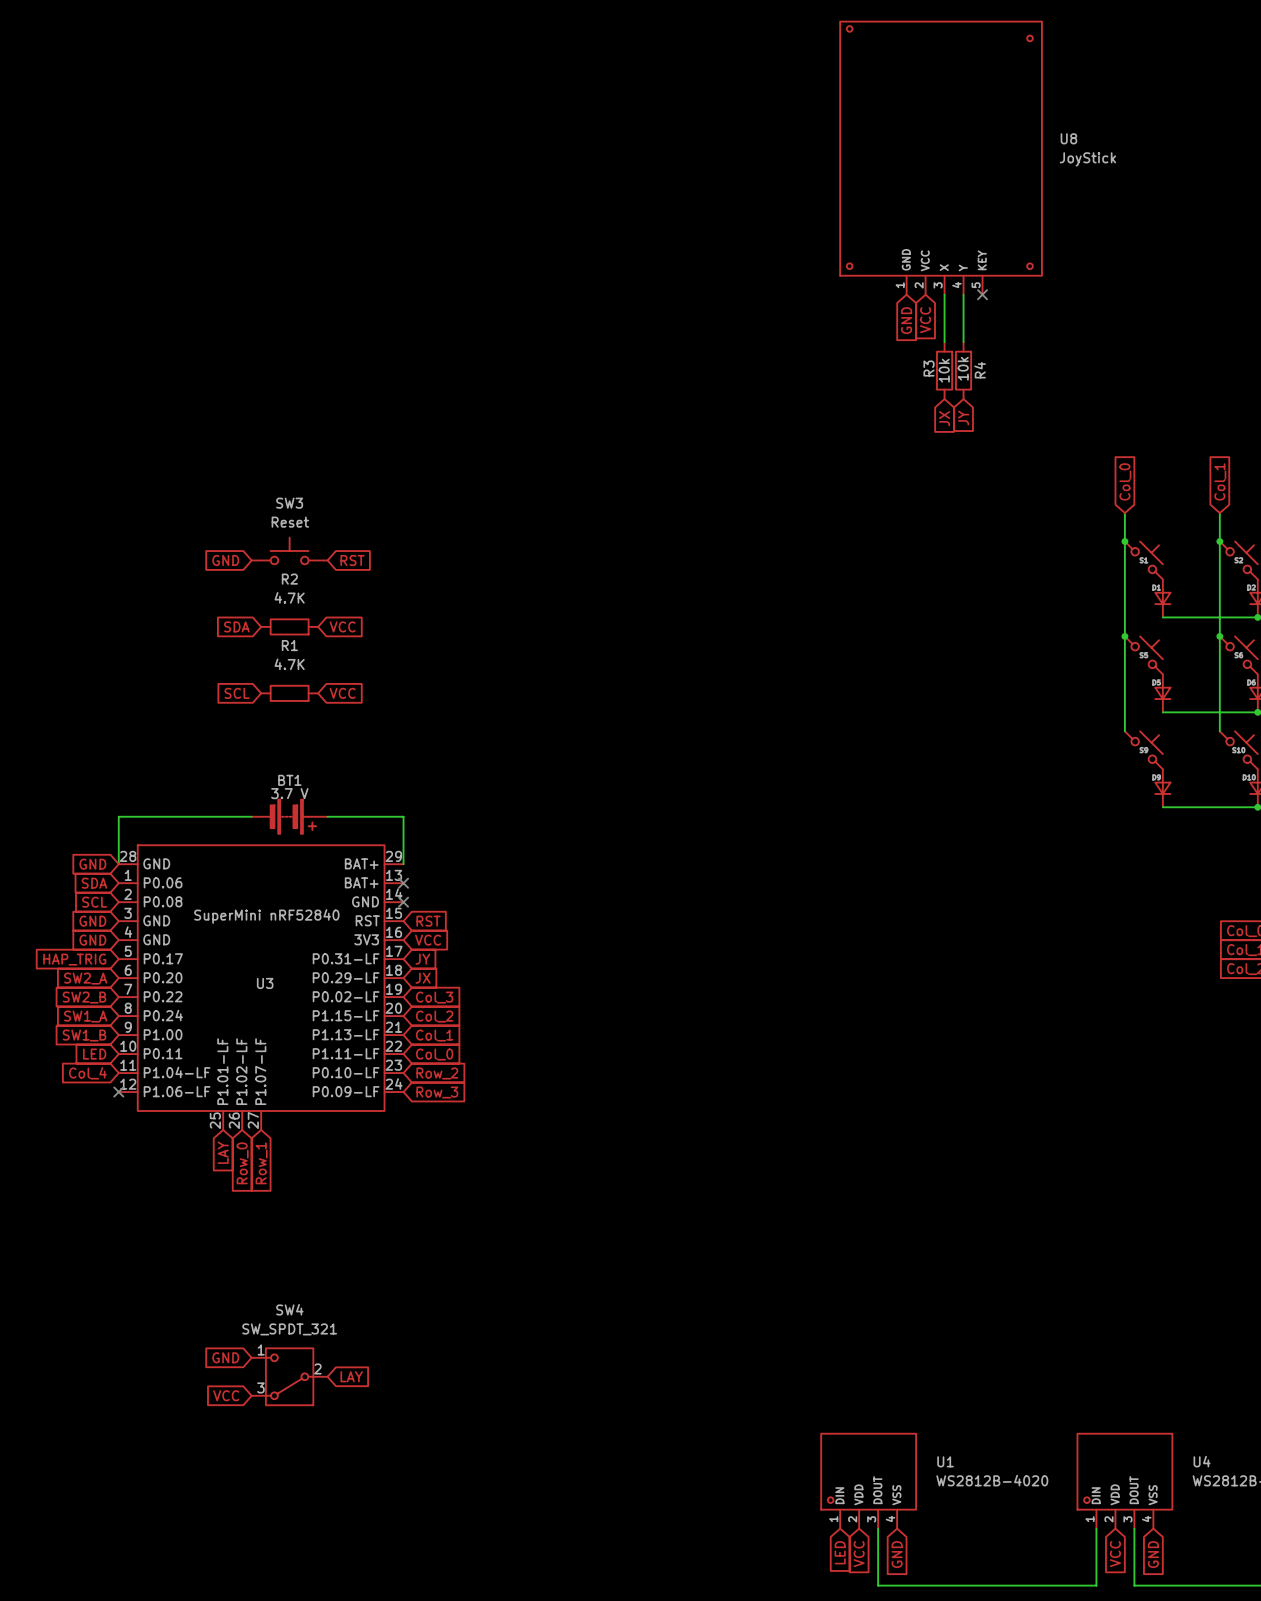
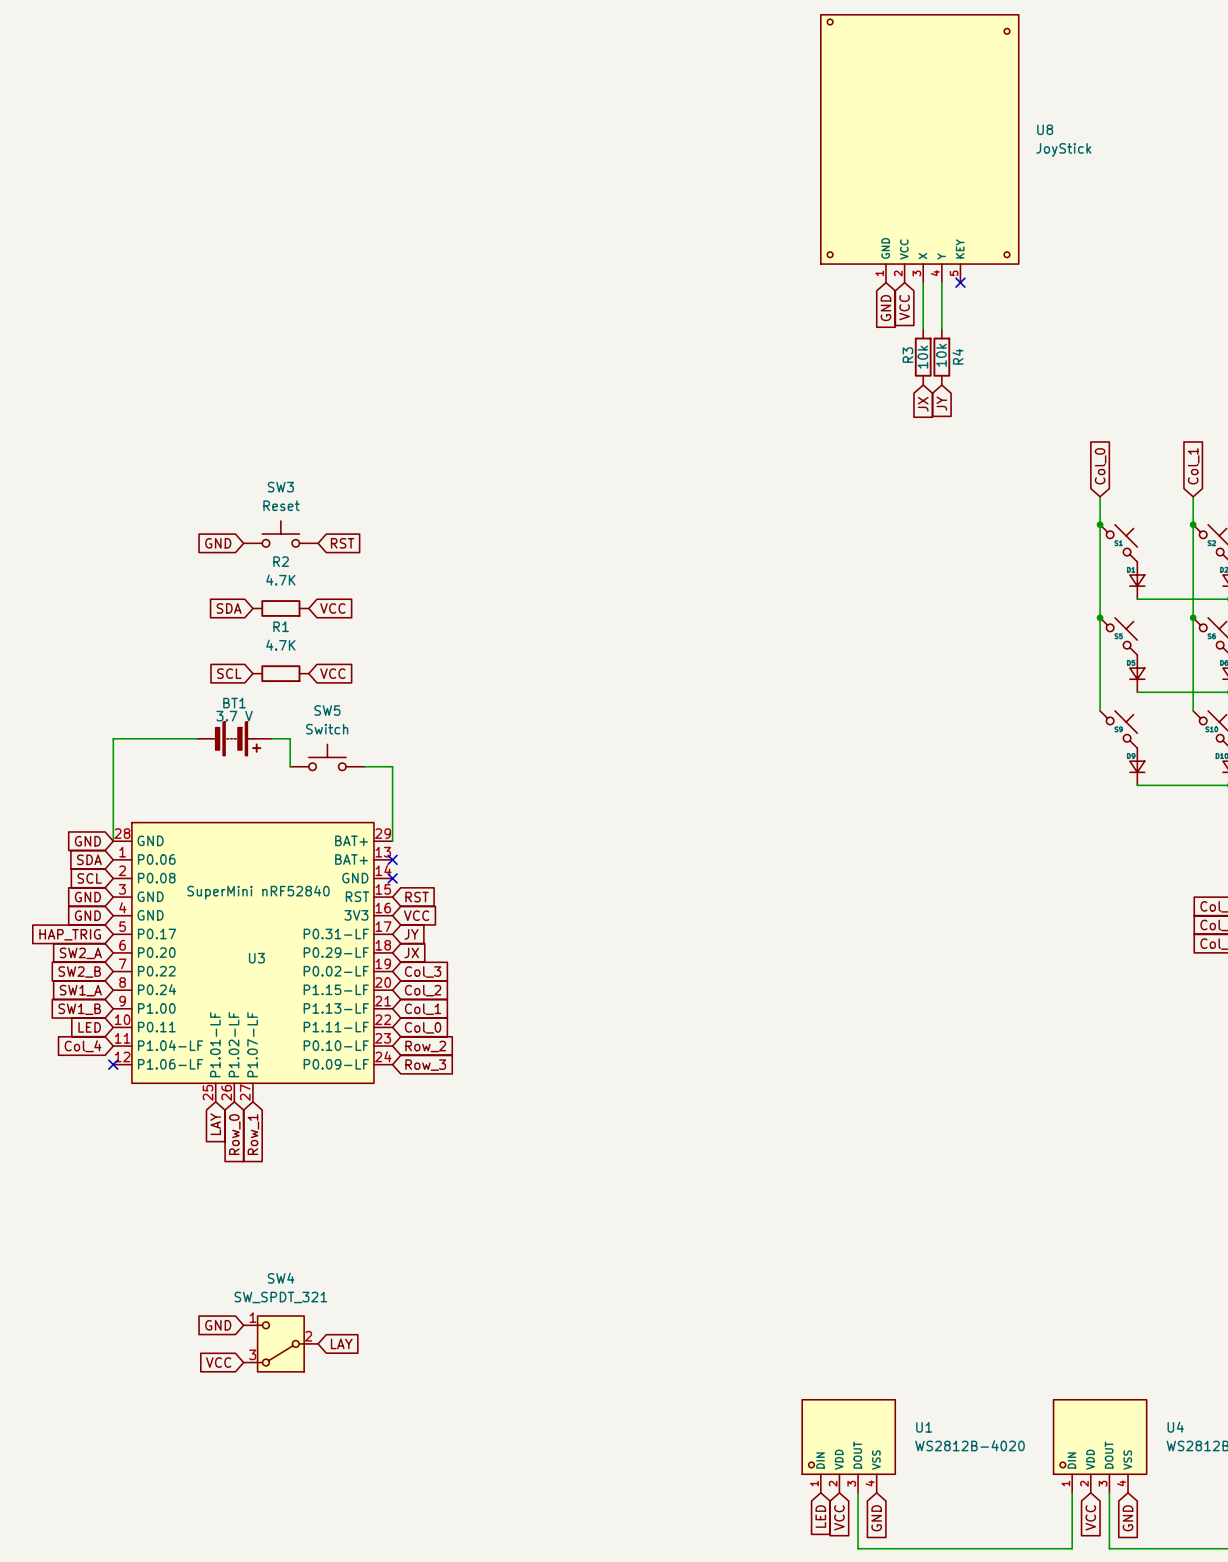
wire: none -> (271, 738) (290, 738) (290, 766)
SW5: none -> Switch (327, 757)
wire: (118, 816) (251, 816) -> (113, 794) (113, 738) (197, 738)
BT1 position: (289, 816) -> (234, 738)
wire: (327, 816) (403, 816) -> (364, 766) (392, 766) (392, 794)

